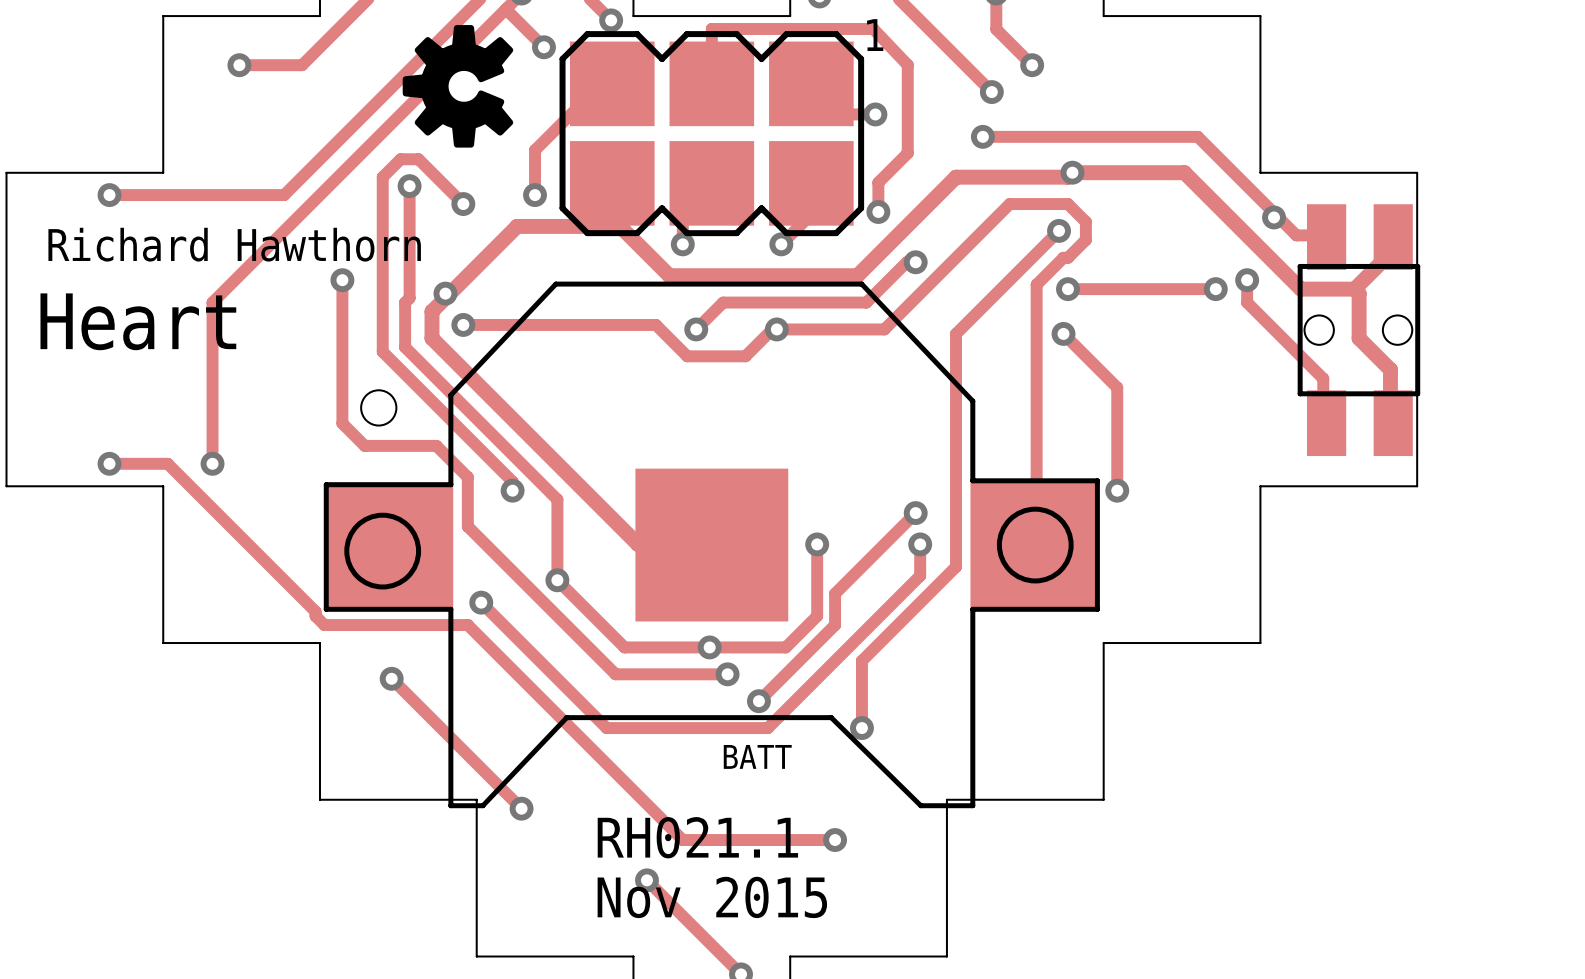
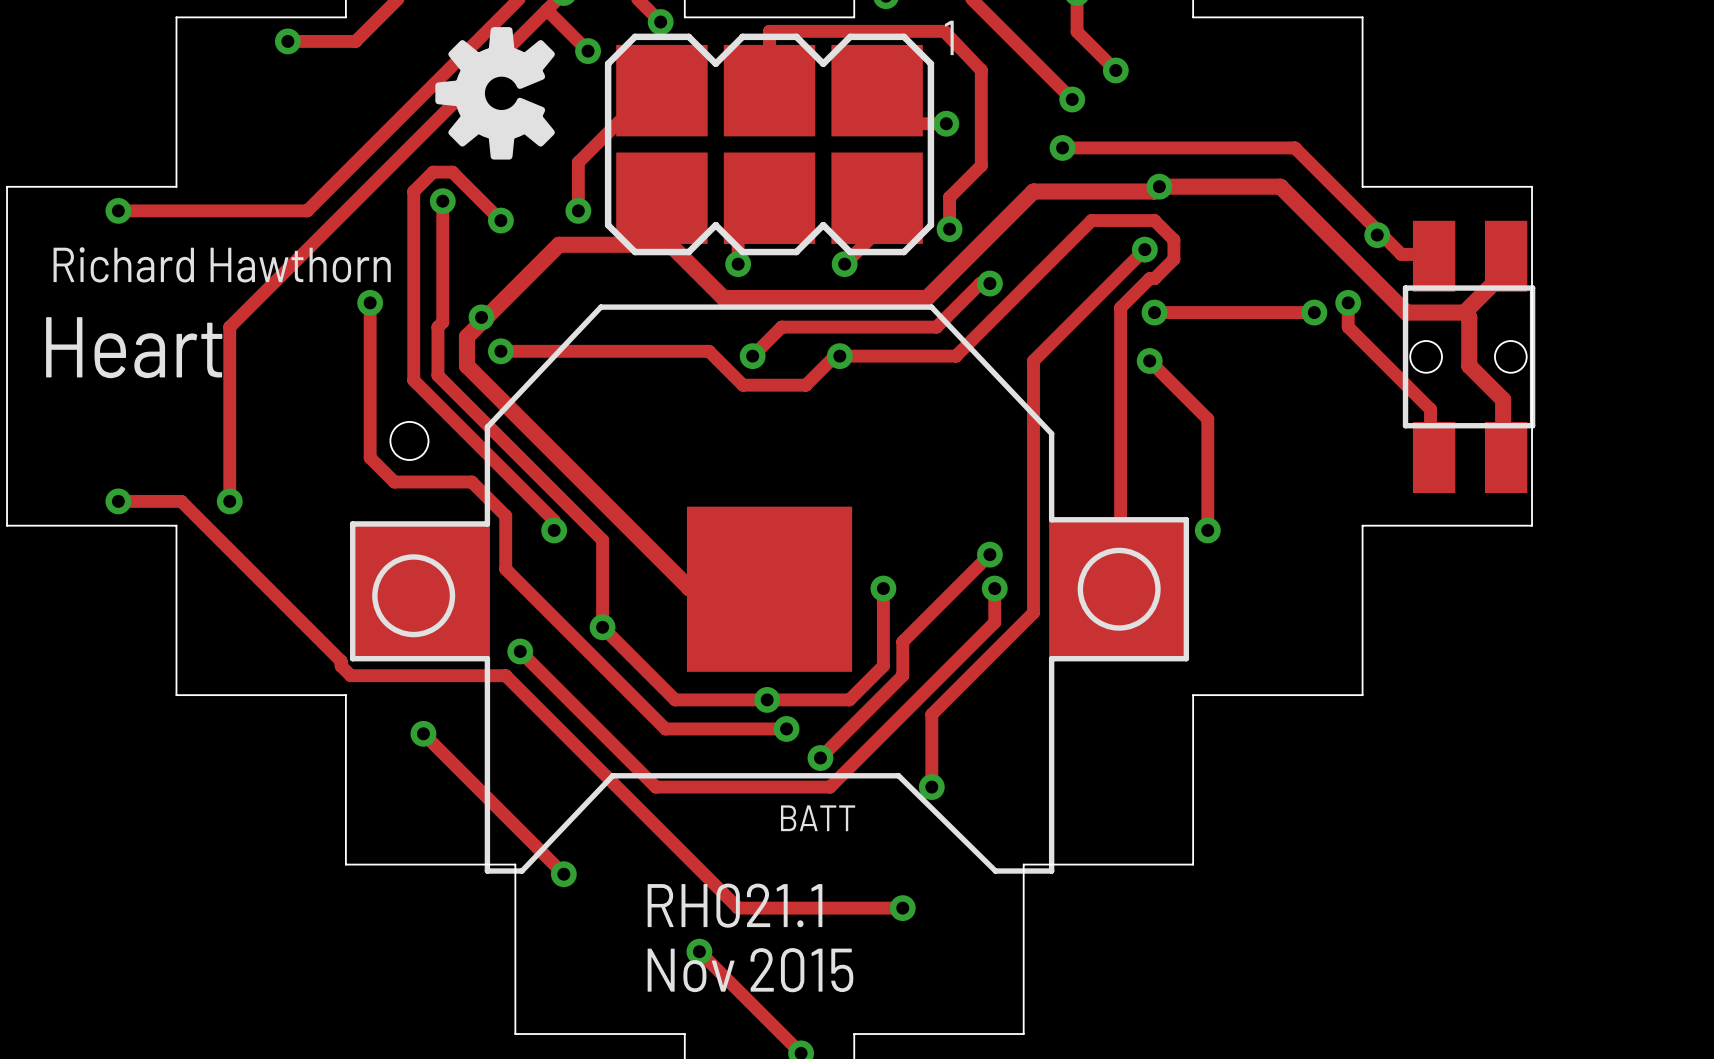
track: (328, 38) (302, 65) (239, 65) -> (355, 41) (287, 41)
via position: (239, 65) -> (287, 41)

